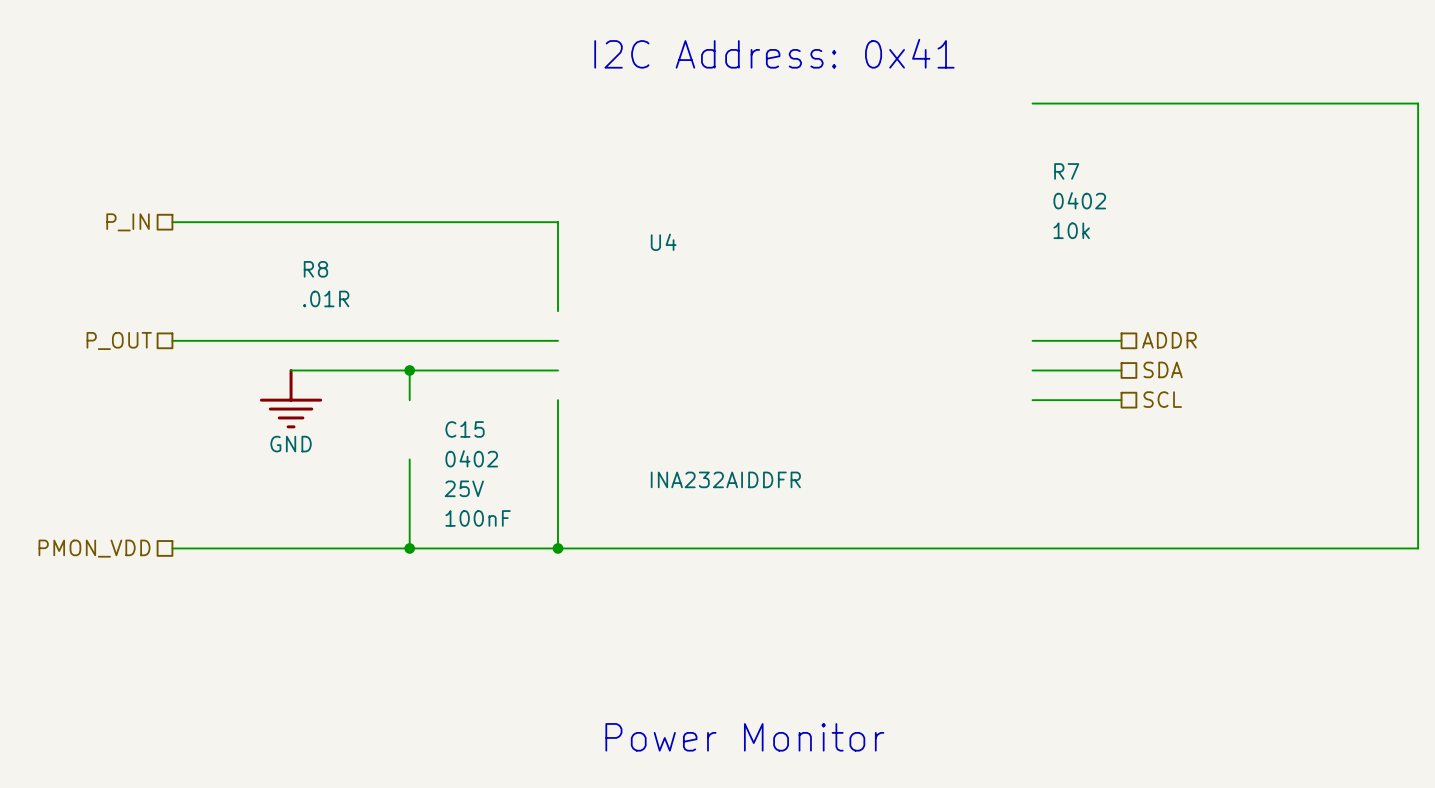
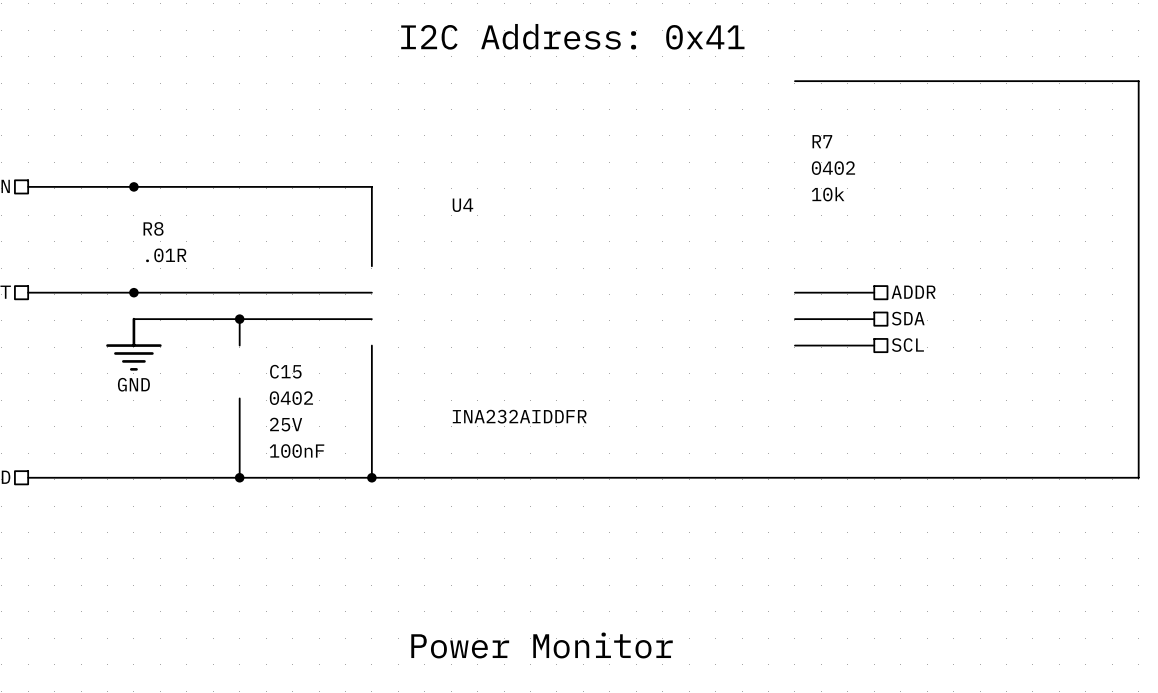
junction: none -> (133, 186)
junction: none -> (133, 292)

